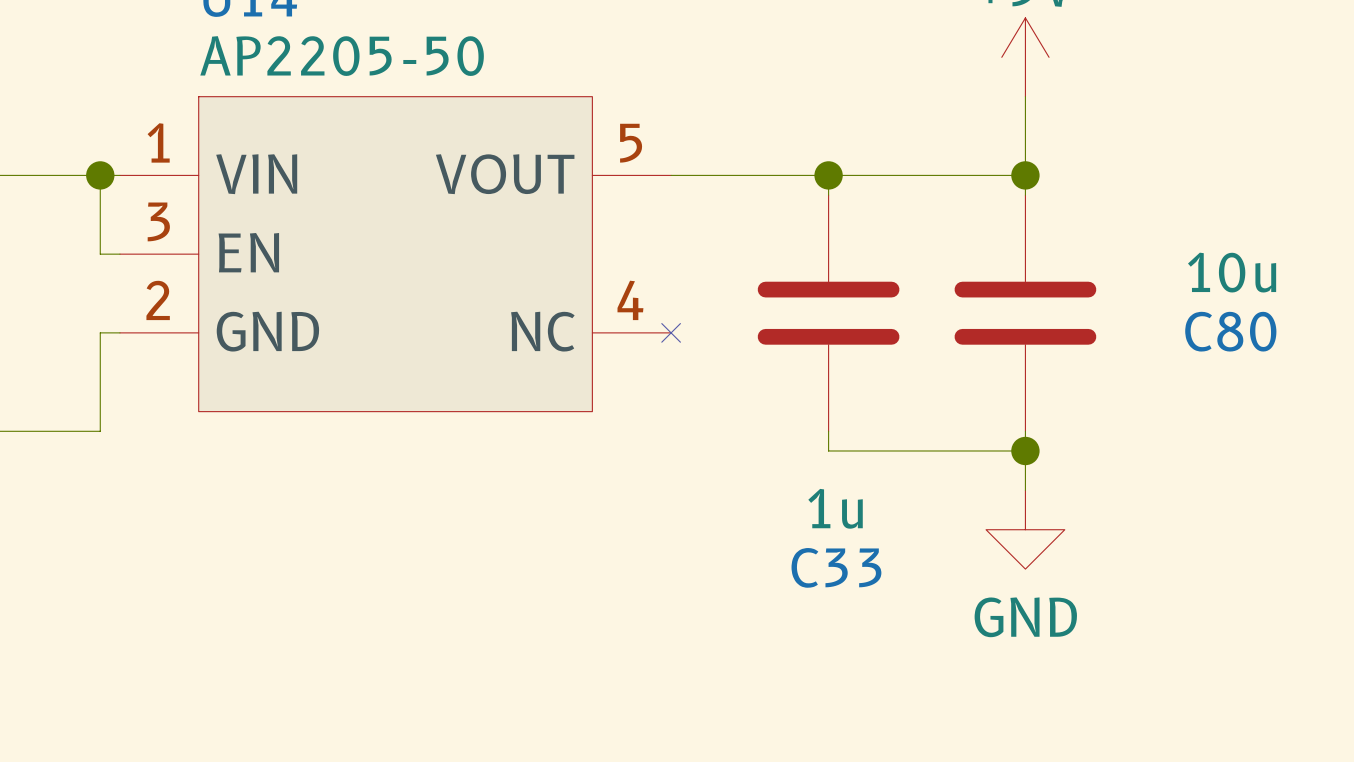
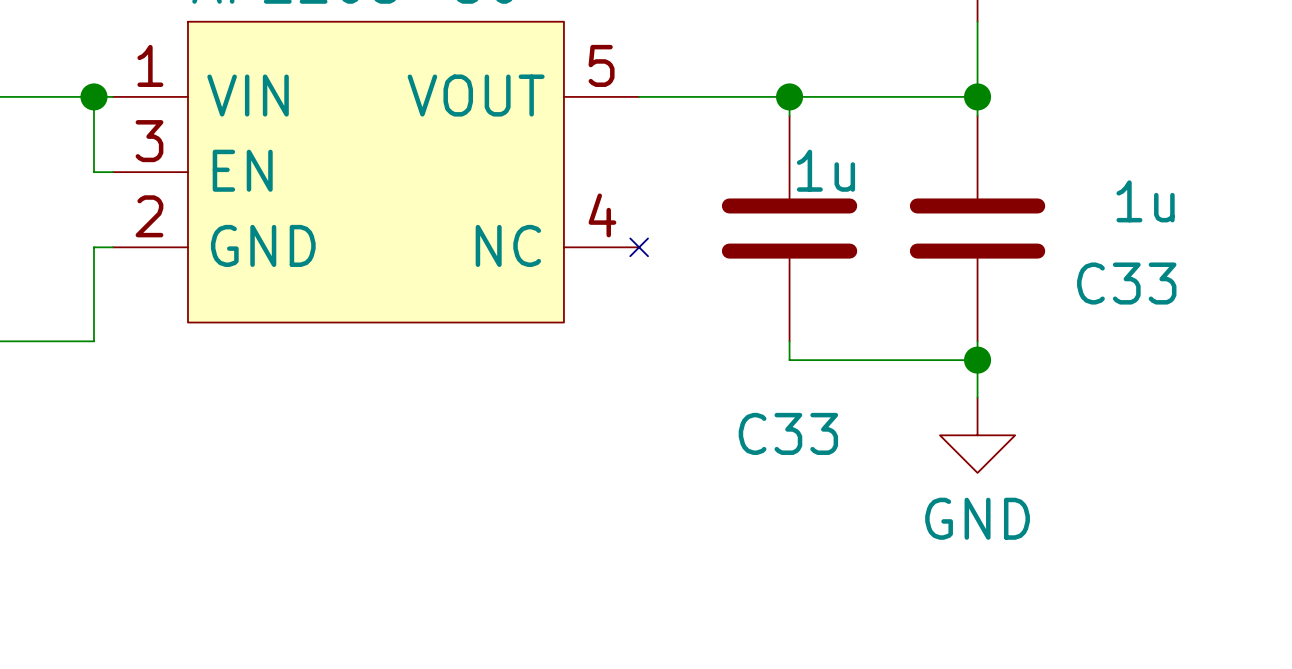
C80 value: 10u (1232, 272) -> 1u (1145, 201)
C80 name: C80 (1230, 331) -> C33 (1126, 283)
C33 value position: 1u (835, 508) -> 1u (825, 170)
C33 name position: C33 (836, 567) -> C33 (788, 433)

